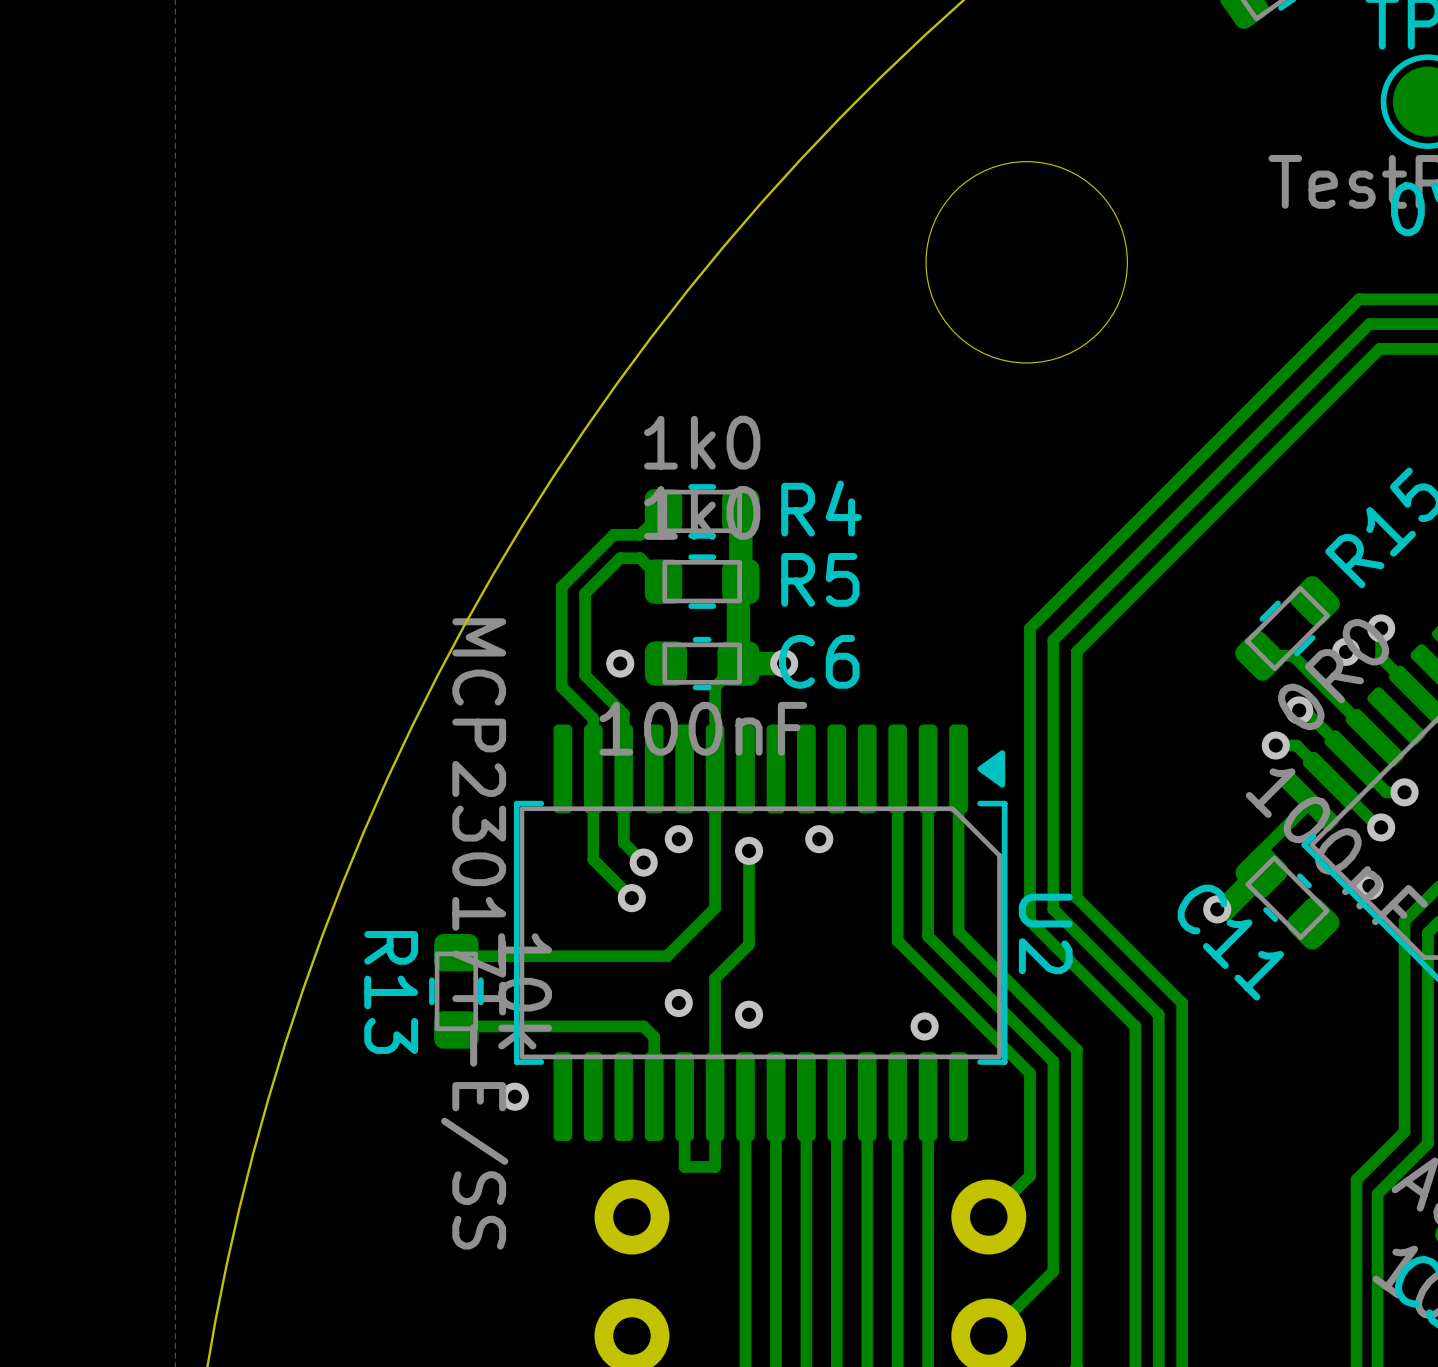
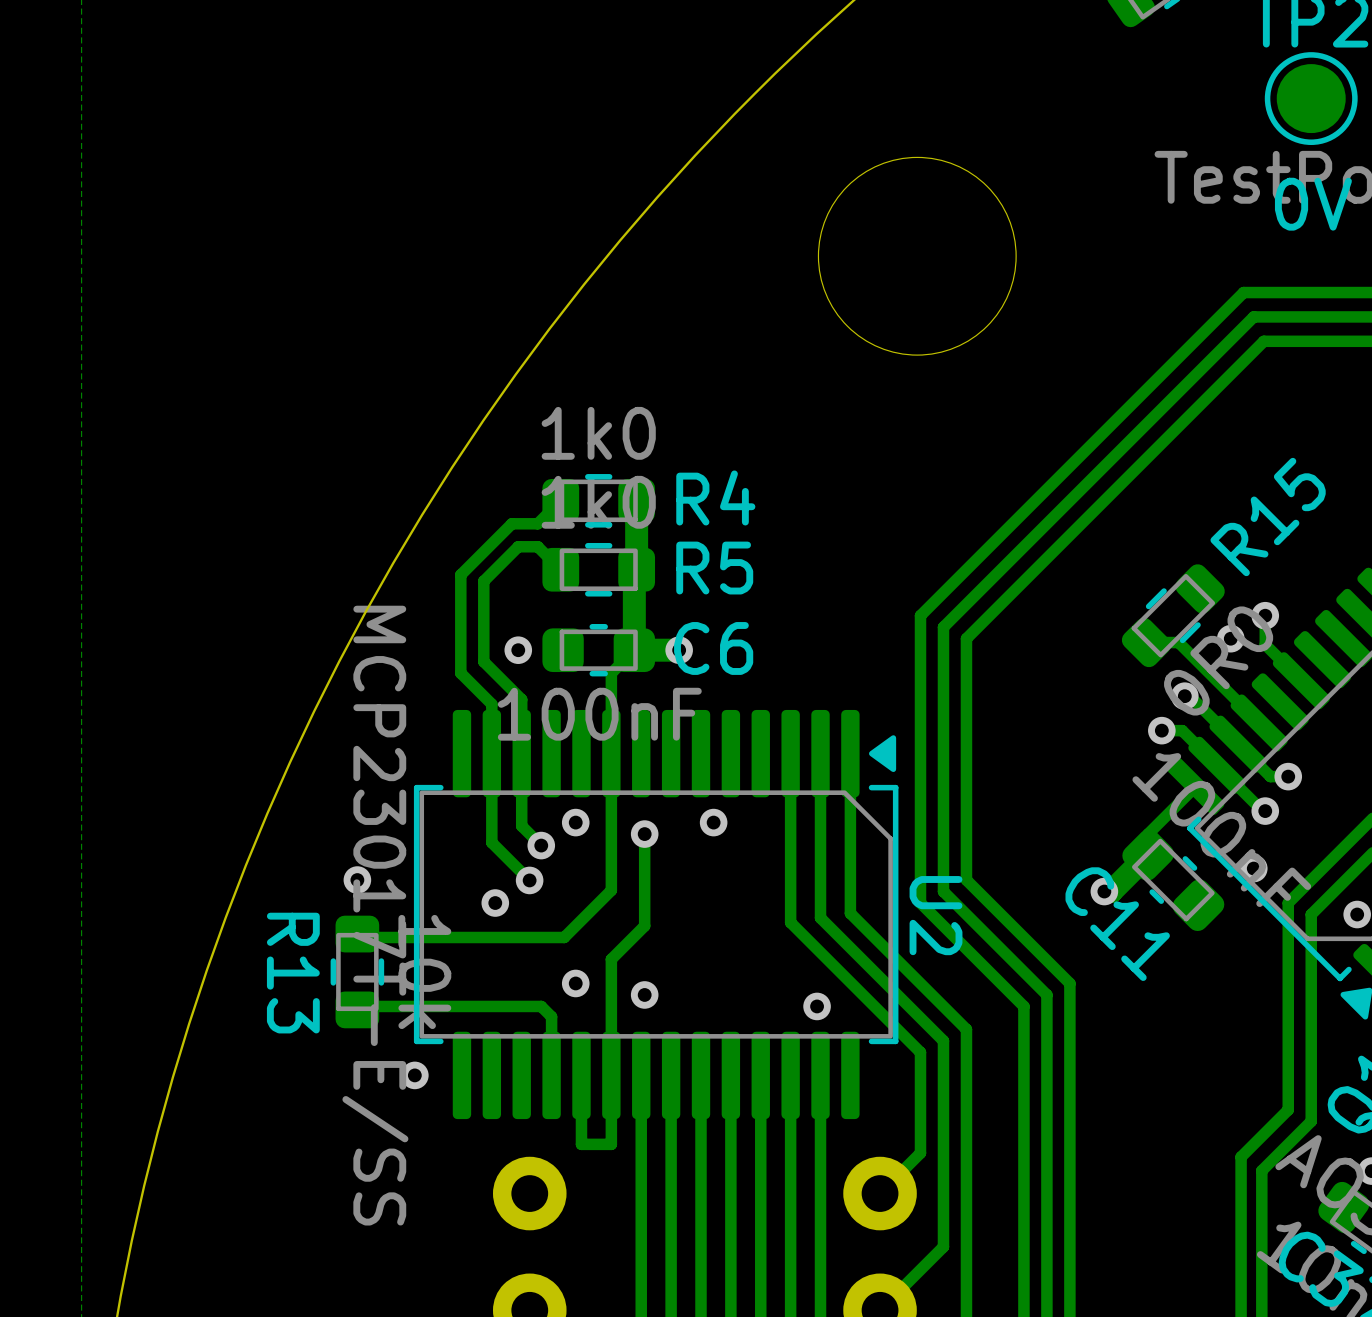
via: none -> (357, 880)
via: none -> (495, 903)

